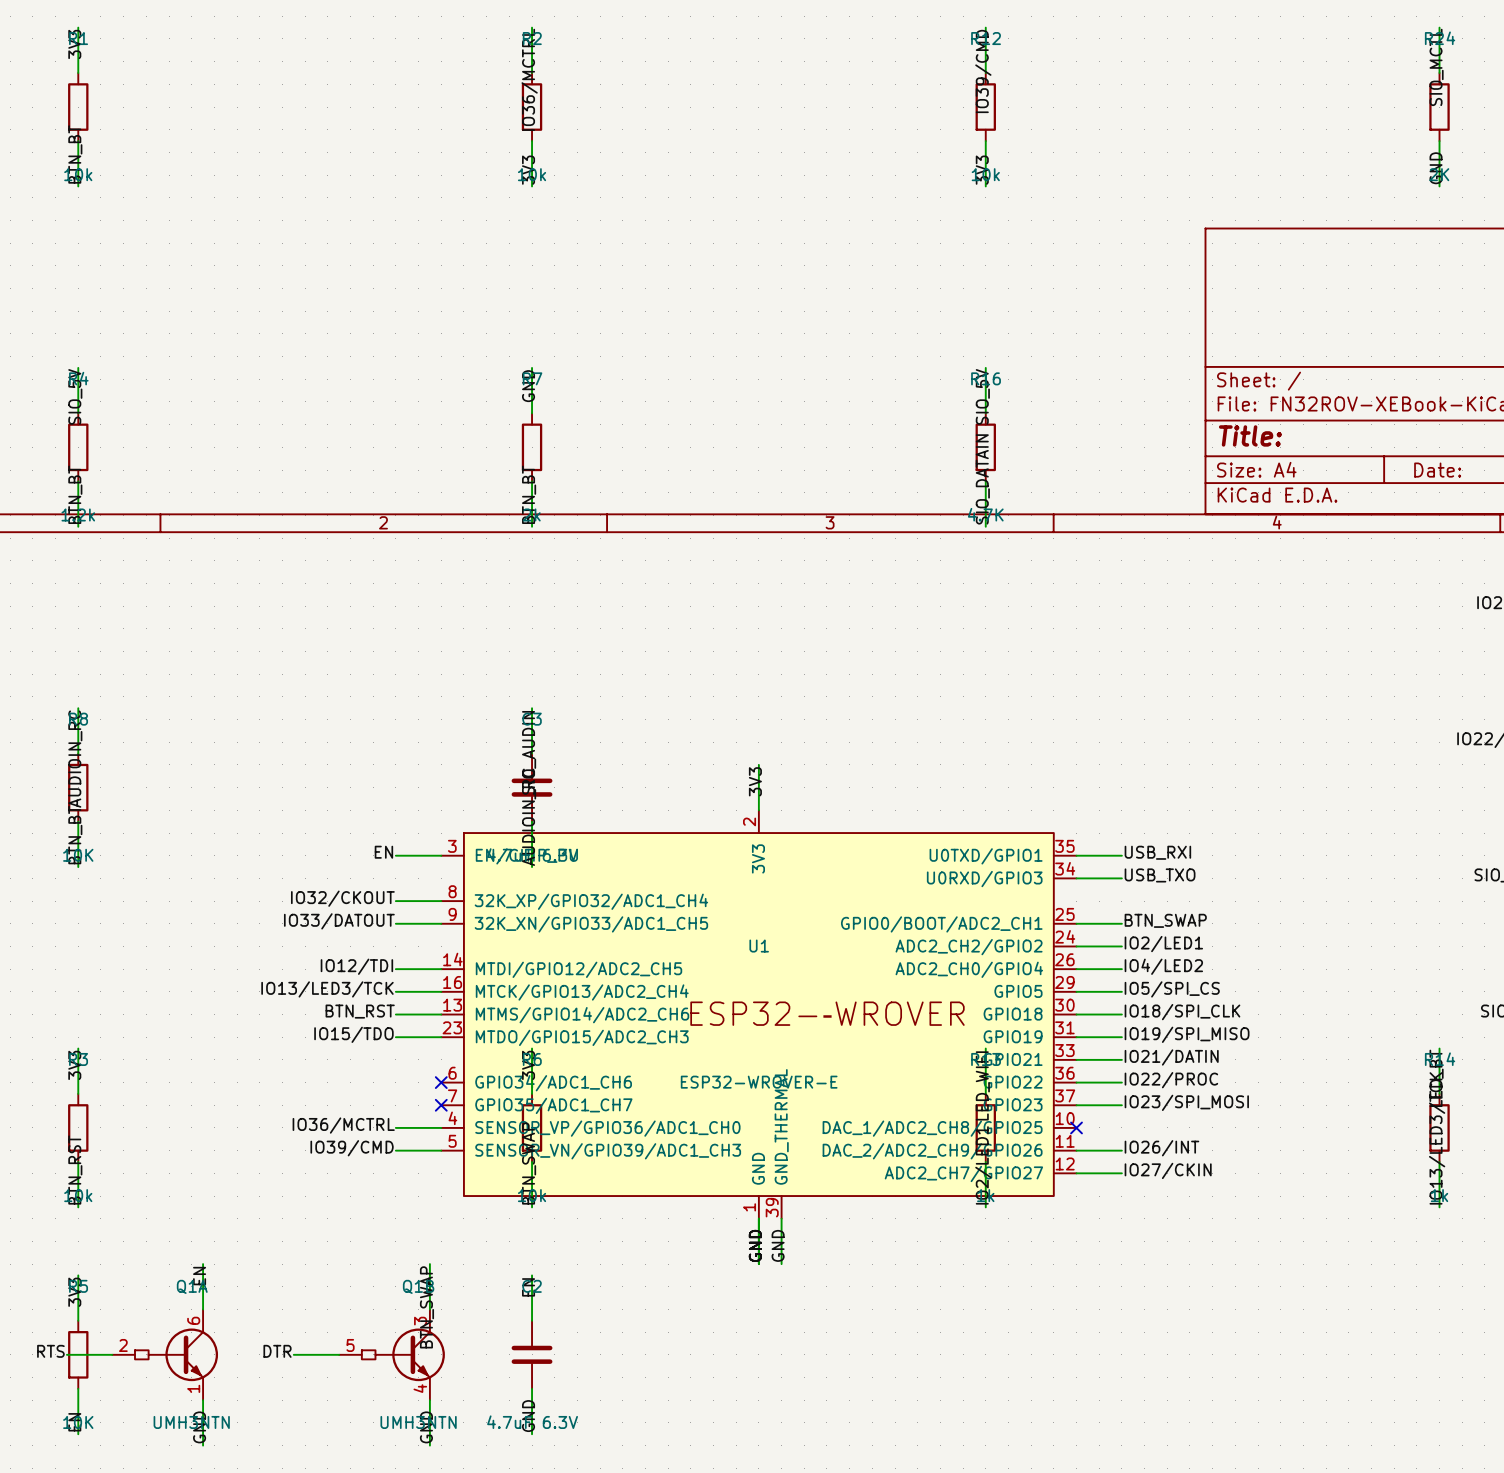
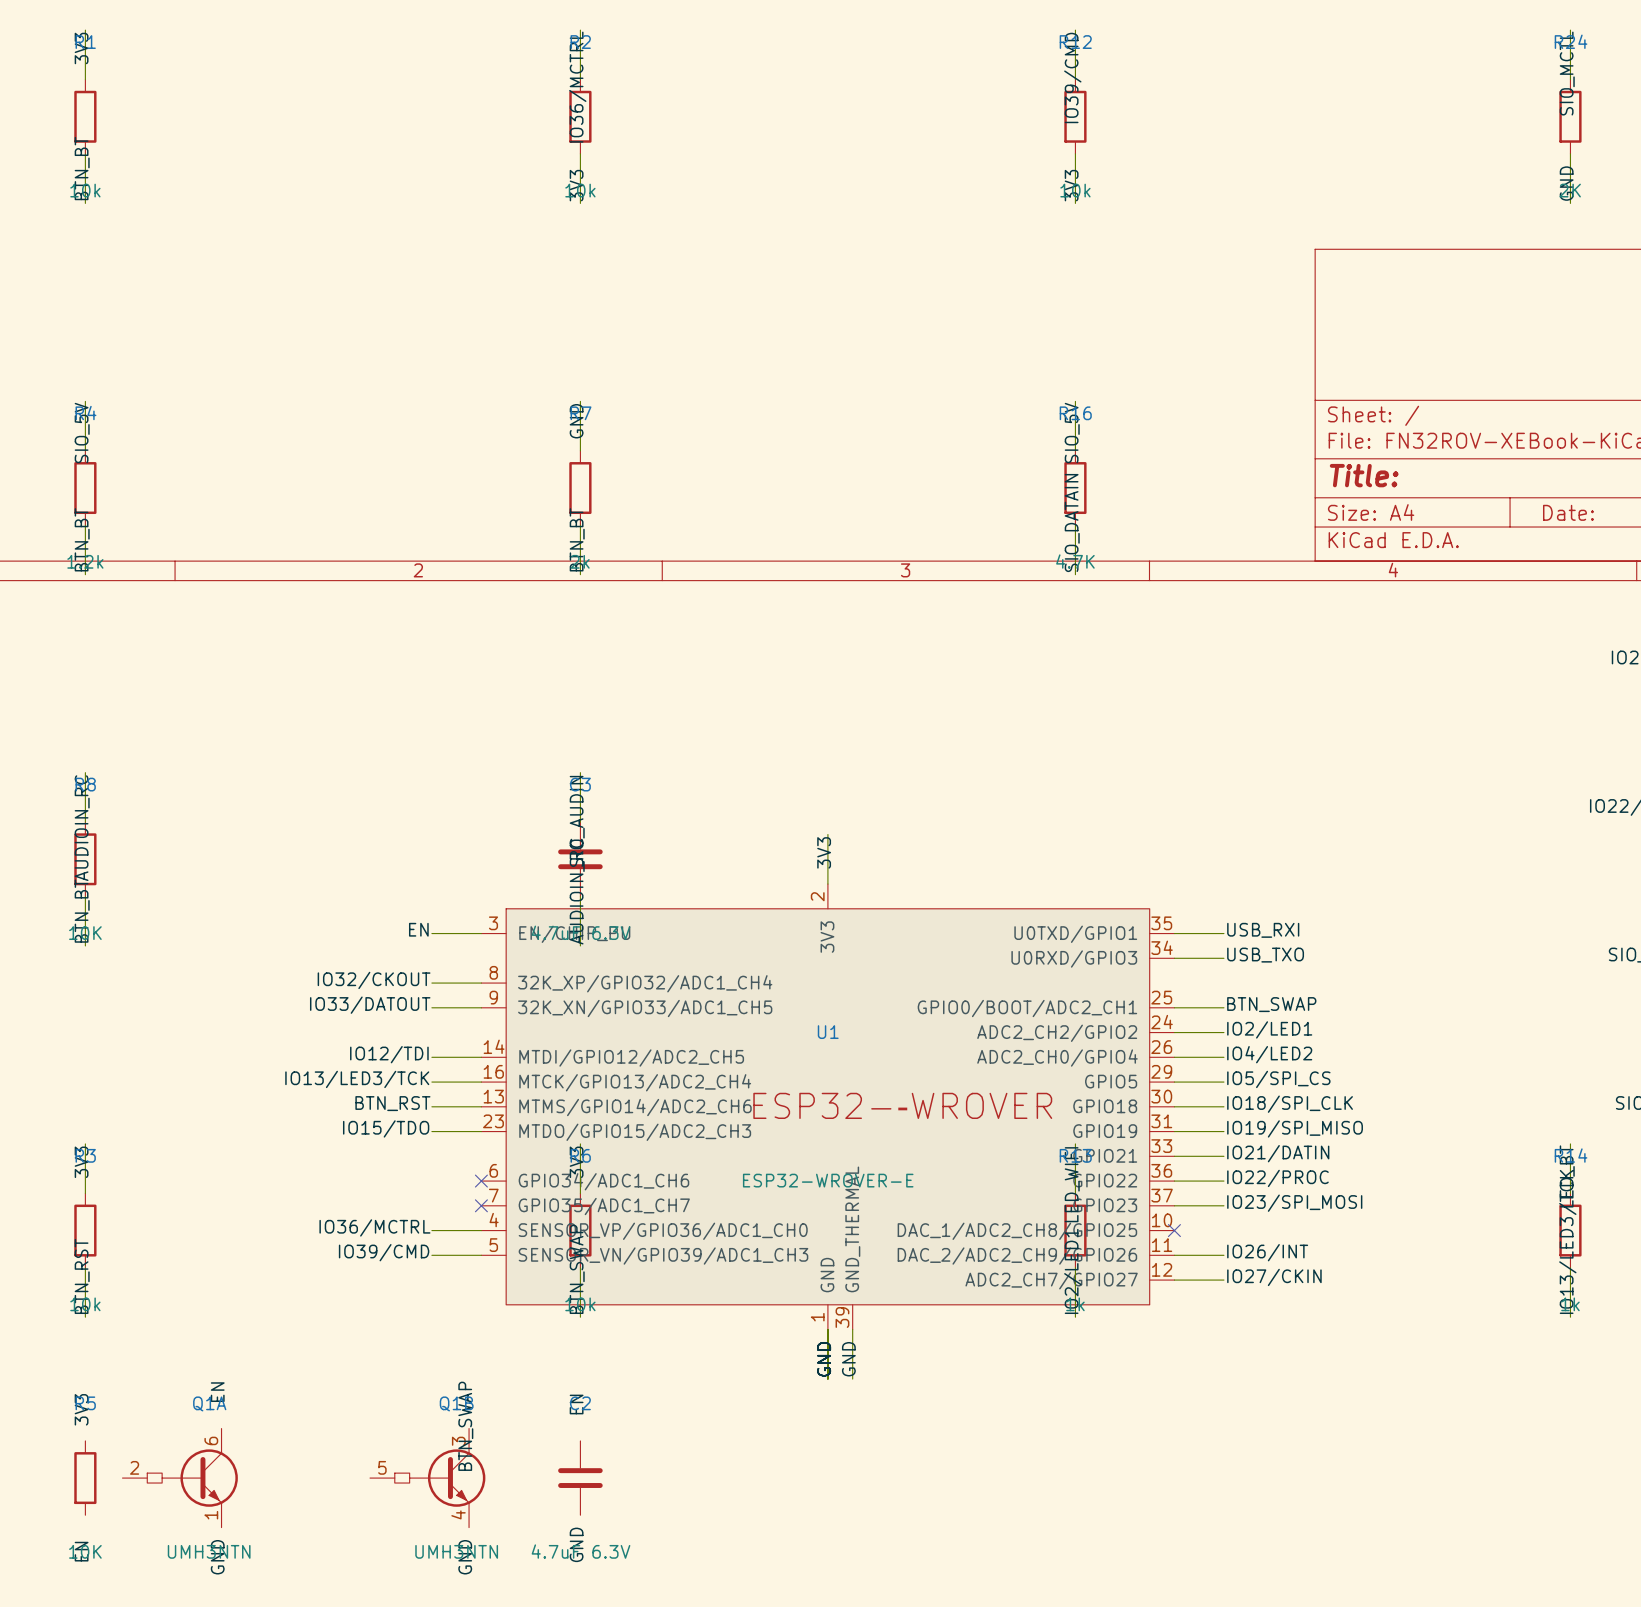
wire: (203, 1264) (203, 1309) -> none
wire: (429, 1264) (429, 1309) -> none
wire: (78, 1275) (78, 1320) -> none
wire: (532, 1275) (532, 1320) -> none
label: RTS (50, 1351) -> none
label: DTR (277, 1351) -> none
wire: (66, 1354) (112, 1354) -> none
wire: (293, 1354) (339, 1354) -> none
wire: (78, 1388) (78, 1434) -> none
wire: (532, 1388) (532, 1434) -> none
wire: (203, 1400) (203, 1445) -> none
wire: (429, 1400) (429, 1445) -> none

